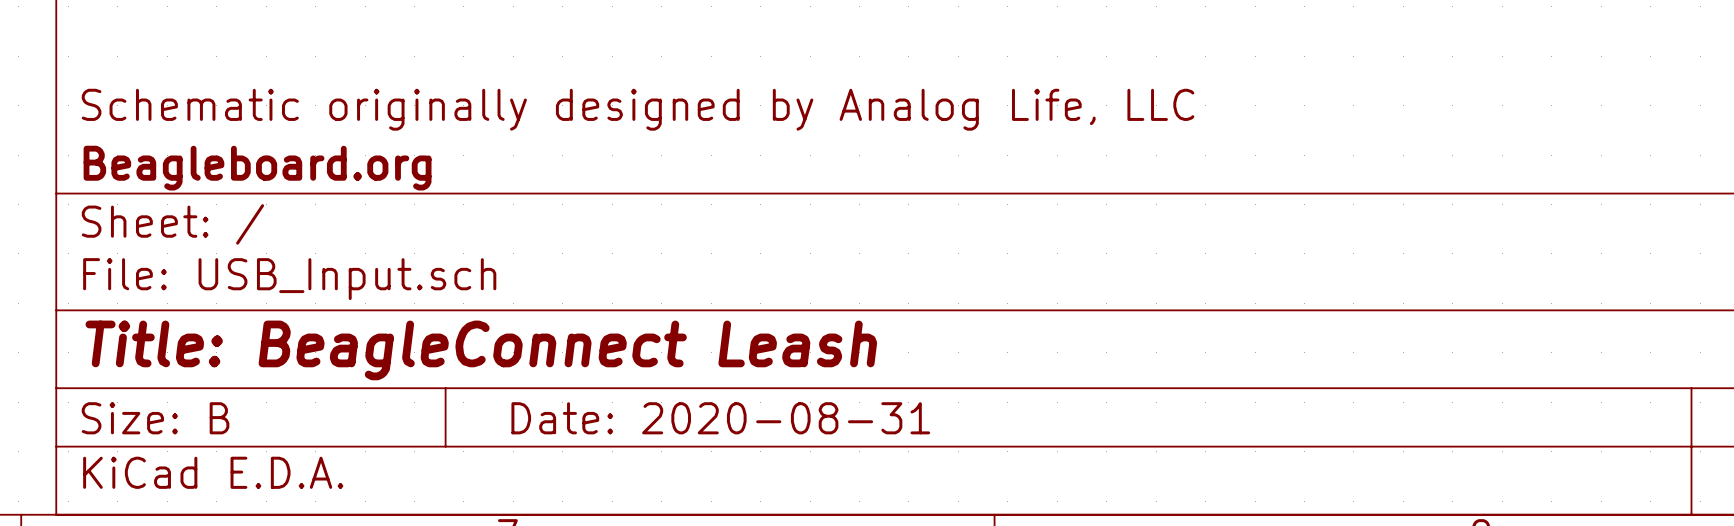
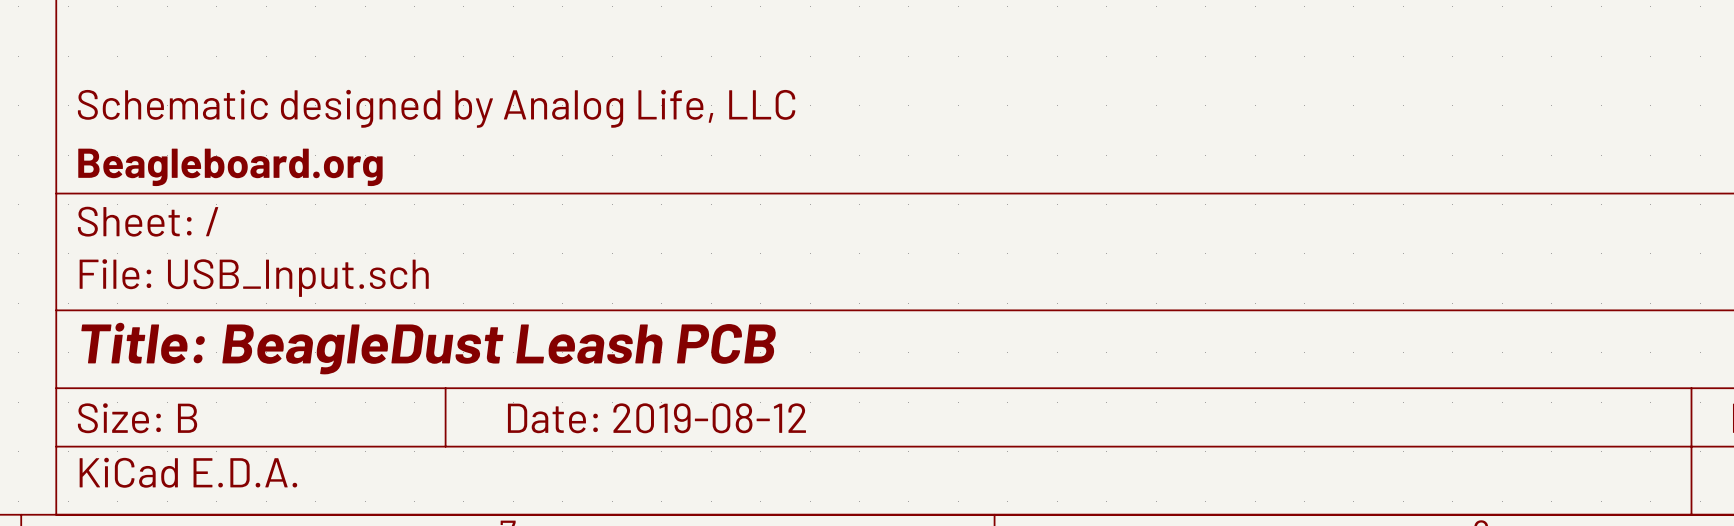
title block: Schematic originally designed by Analog Life, LLC (638, 109) -> Schematic designed by Analog Life, LLC (436, 108)
title block: Title: BeagleConnect Leash (481, 350) -> Title: BeagleDust Leash PCB (429, 348)
title block: Date: 2020-08-31 (720, 418) -> Date: 2019-08-12 (656, 418)

